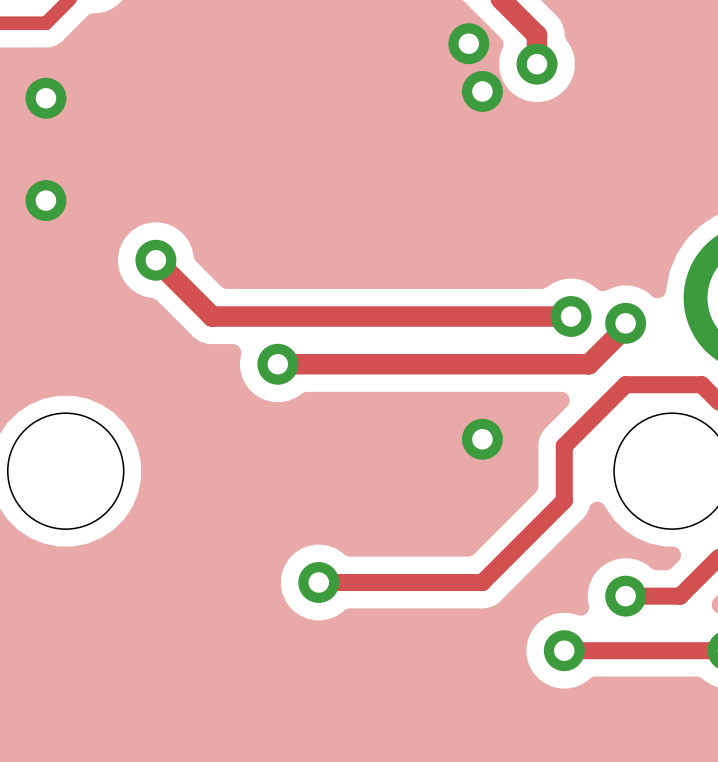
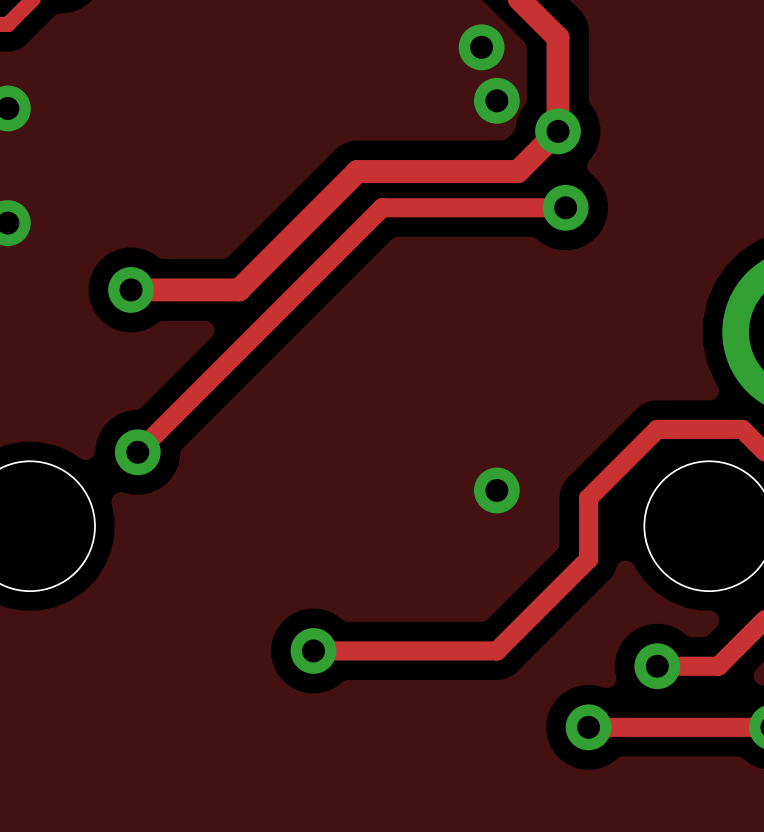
via position: (536, 64) -> (558, 131)
track: none -> (565, 207) (382, 207) (137, 452)
via: none -> (565, 207)
track: (155, 260) (212, 316) (571, 316) -> (131, 289) (239, 289) (357, 171) (517, 171) (558, 131) (558, 70)
via: (571, 316) -> none
track: (625, 323) (625, 327) (588, 364) (277, 364) -> none
via: (625, 323) -> none
via position: (277, 364) -> (137, 452)

